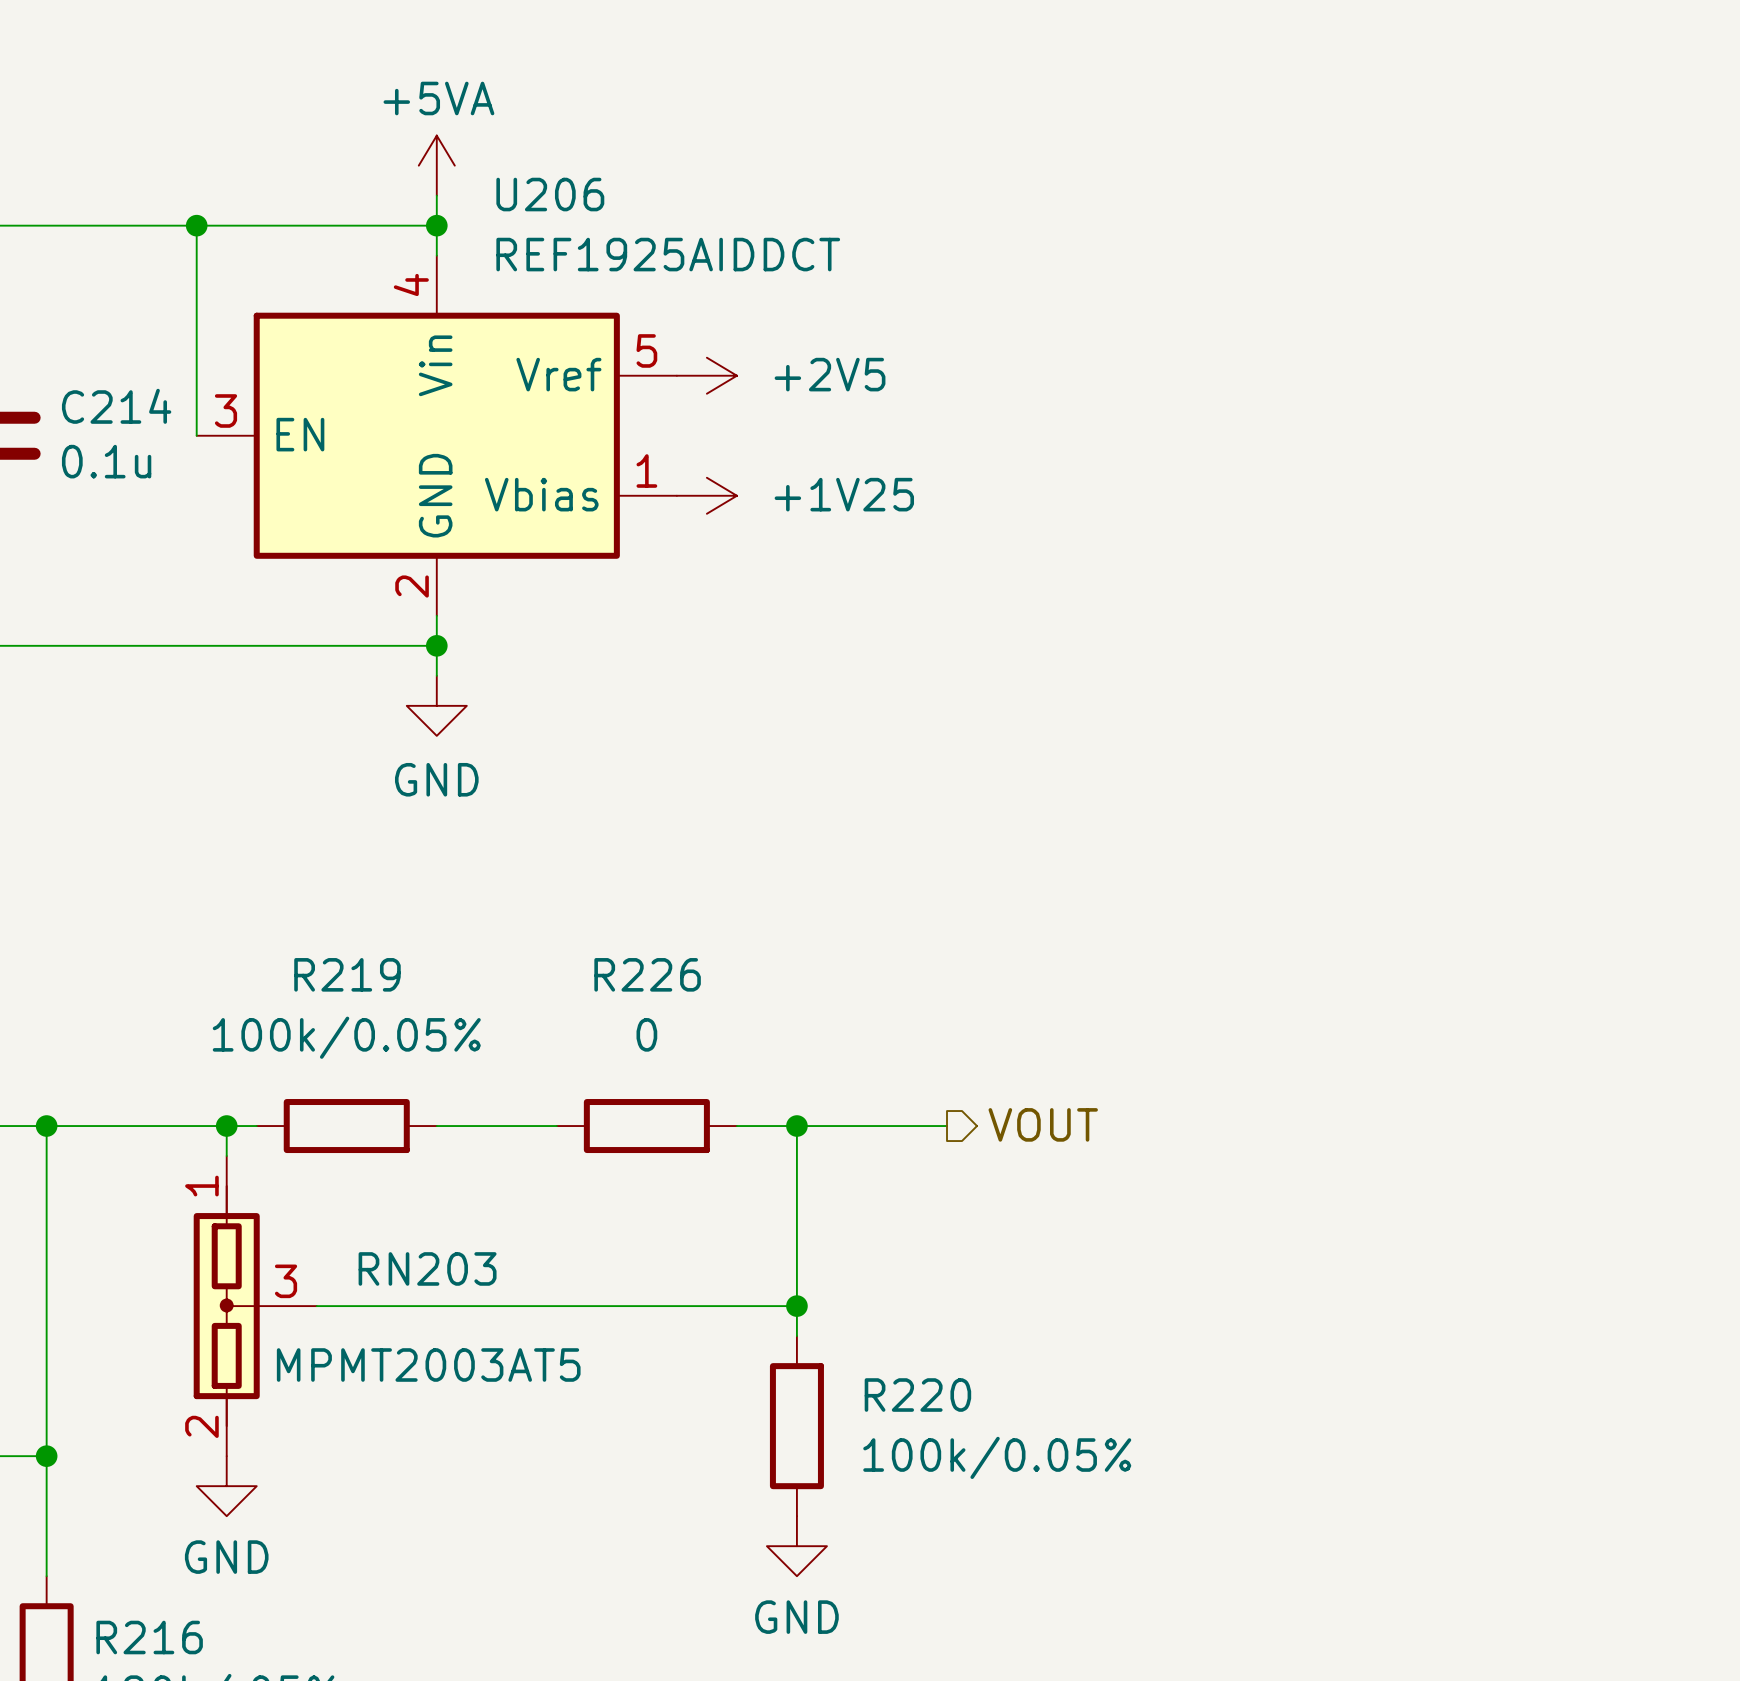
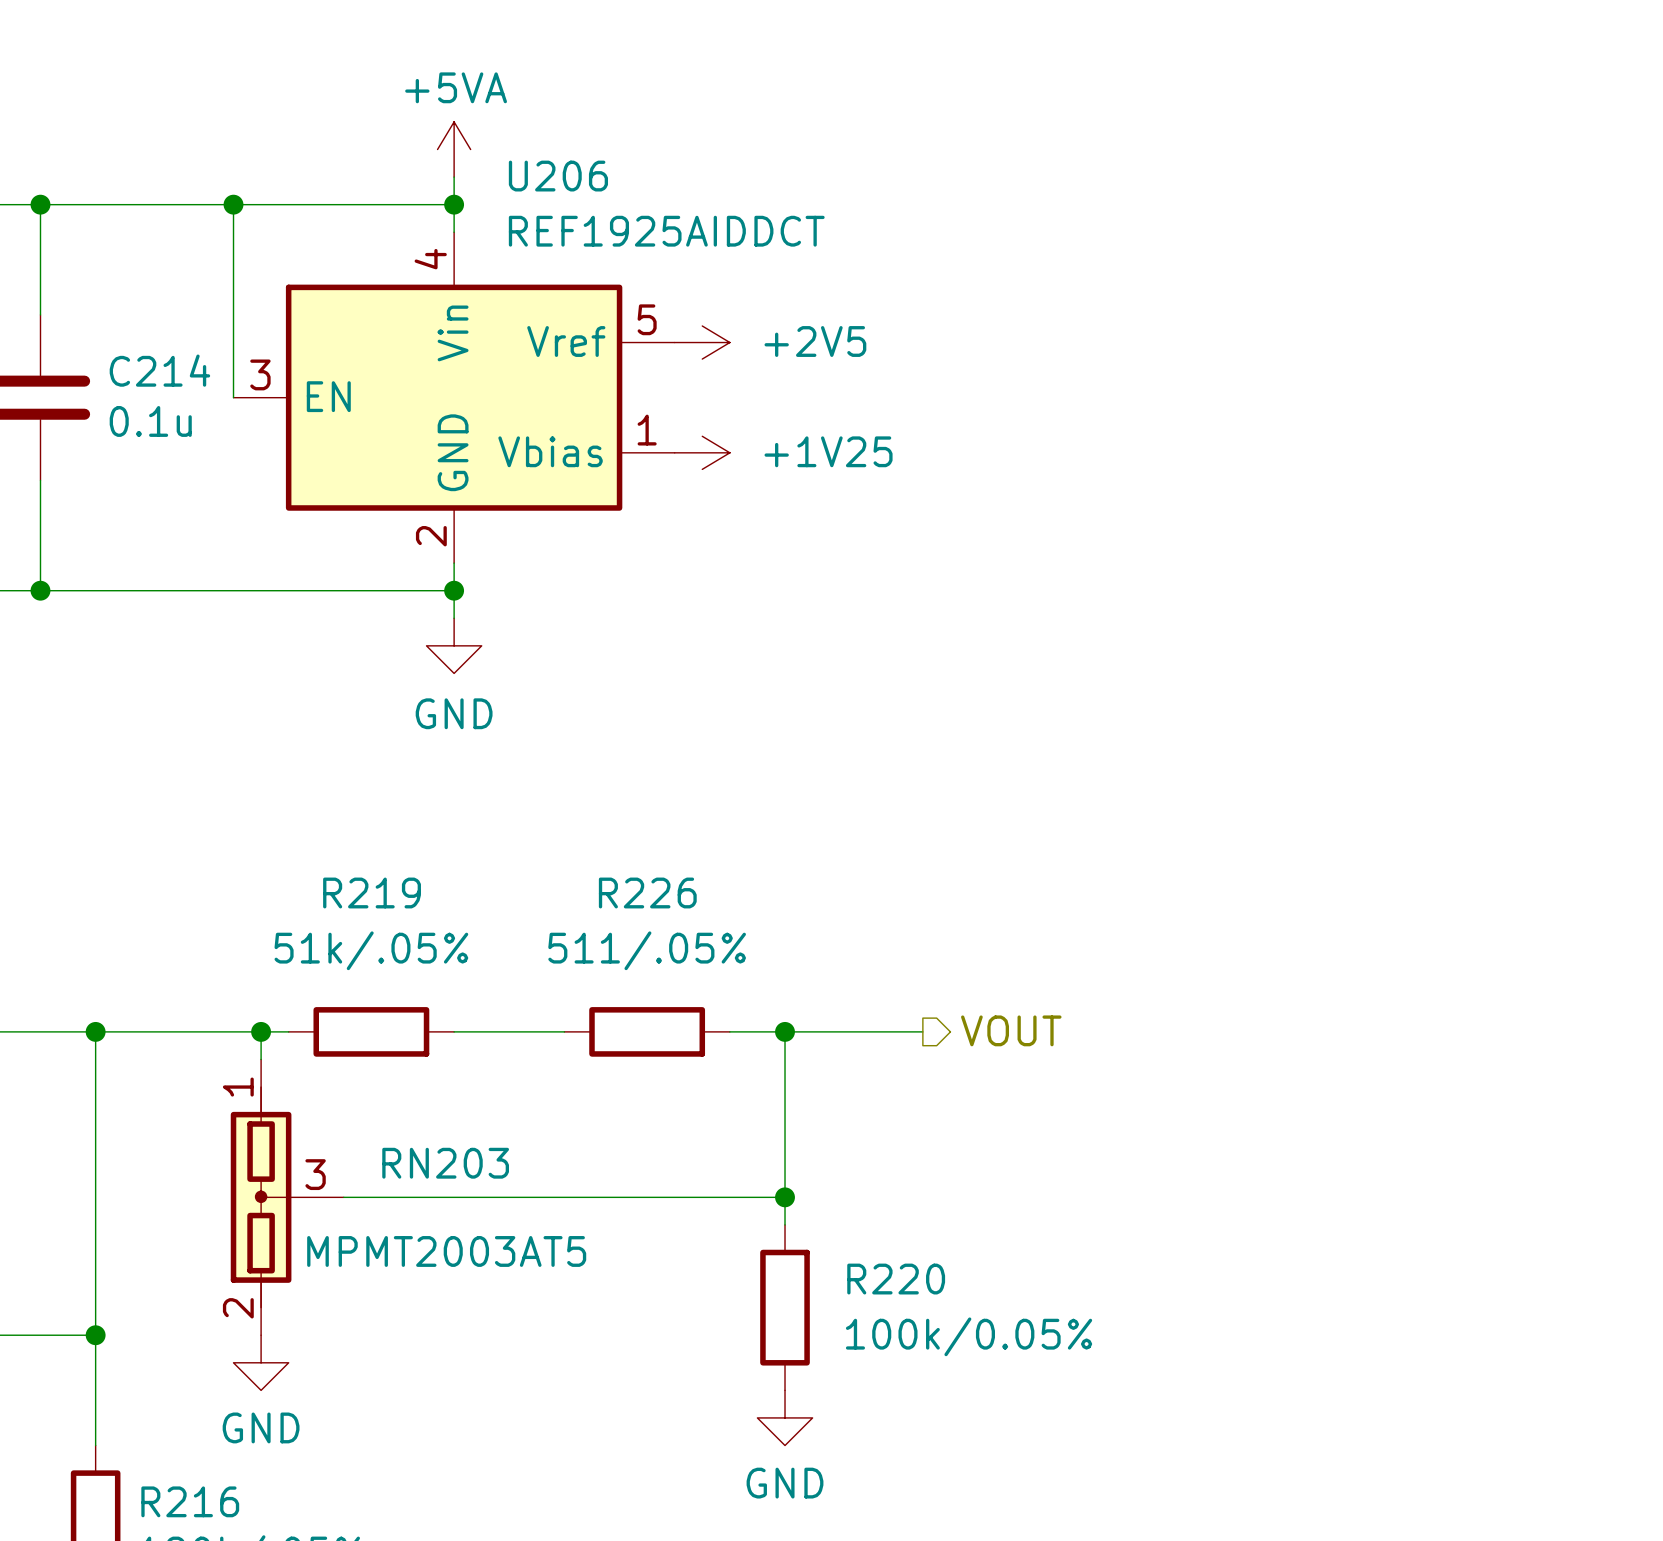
R226 value: 0 (646, 1034) -> 511/.05% (647, 950)
R219 value: 100k/0.05% (346, 1037) -> 51k/.05% (371, 950)

